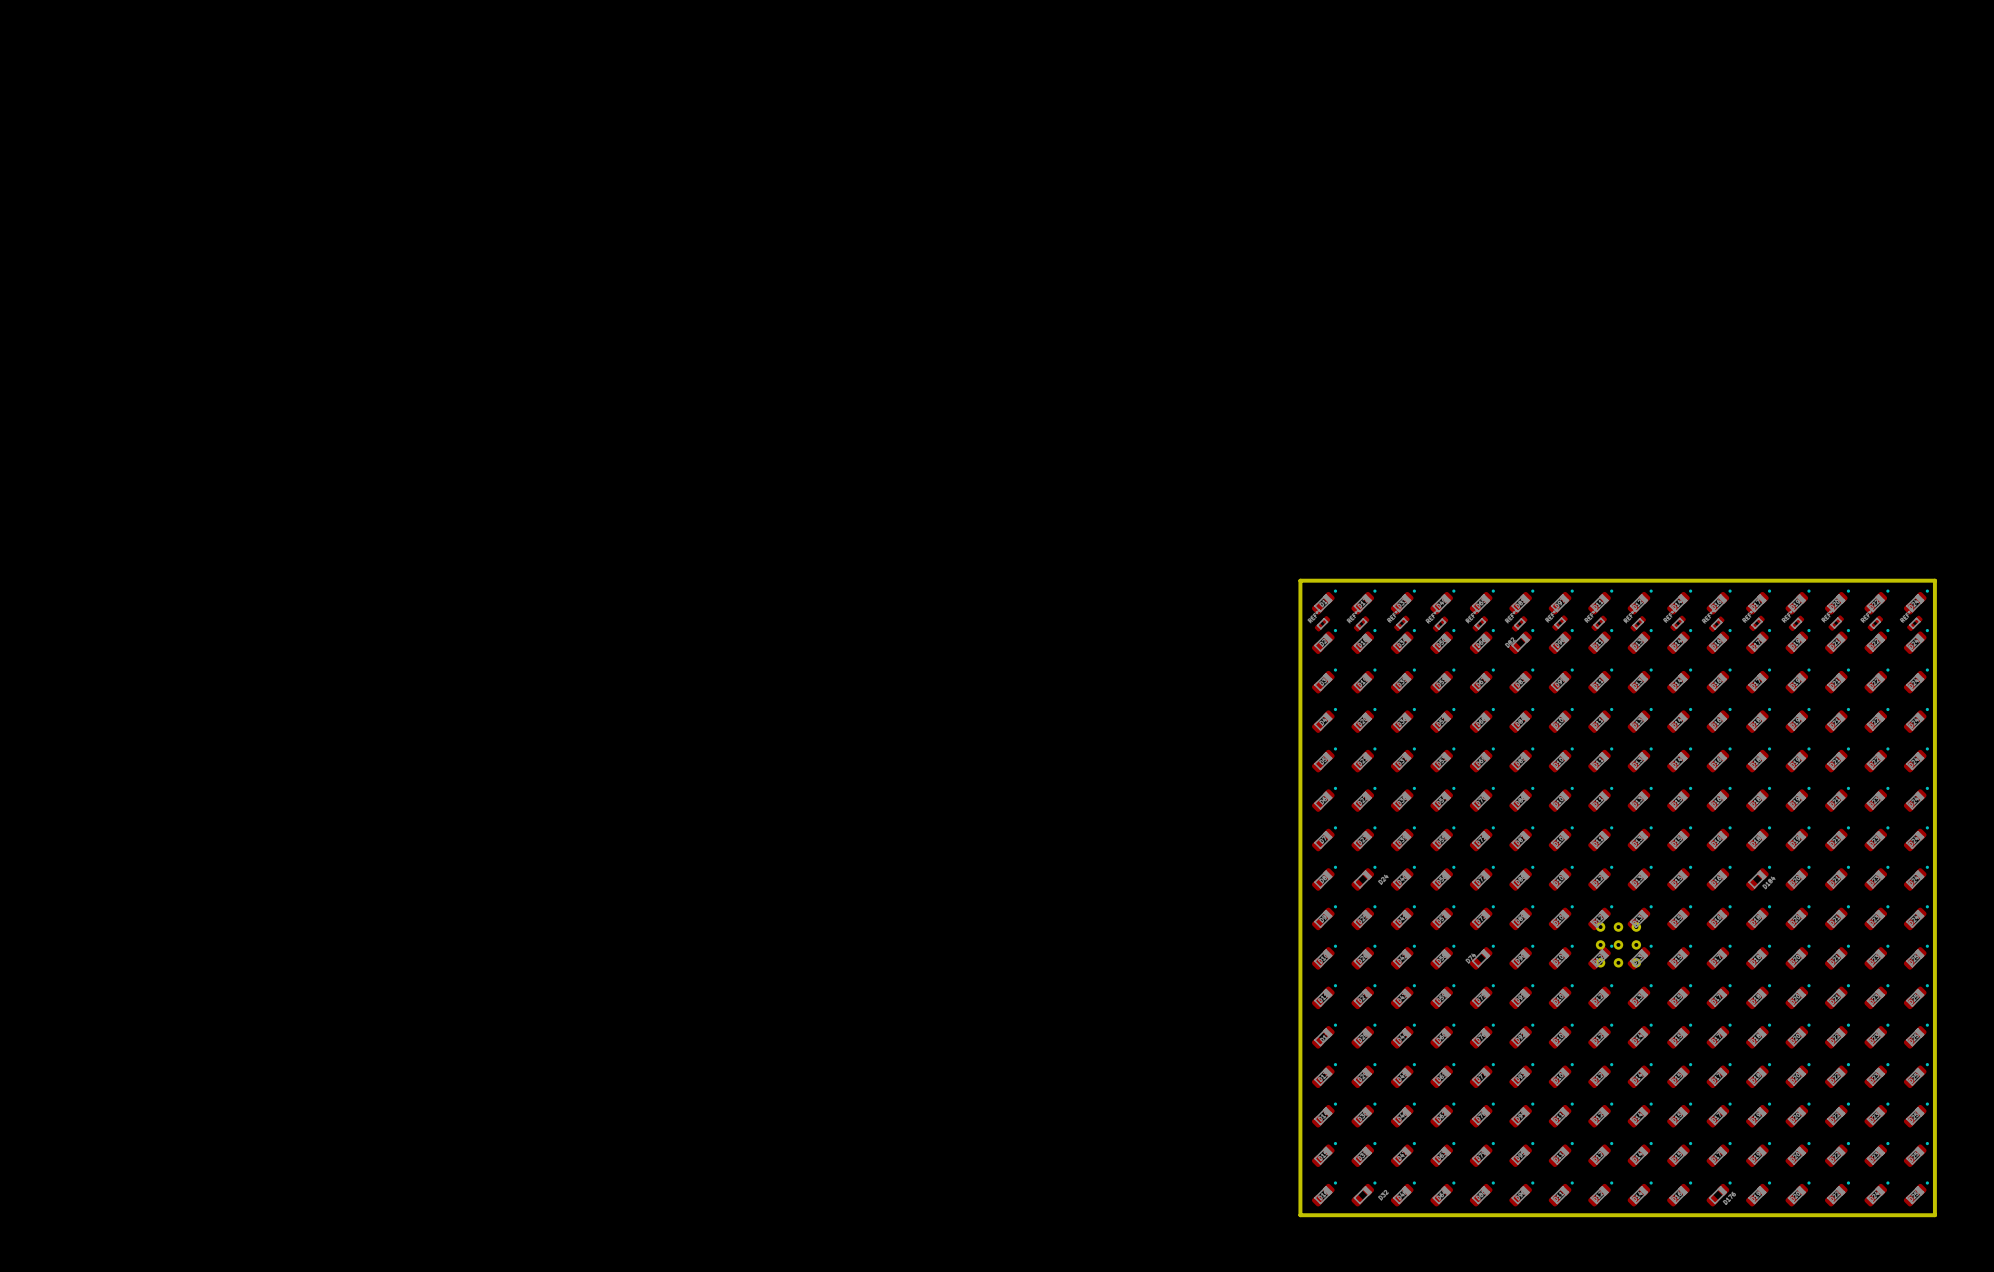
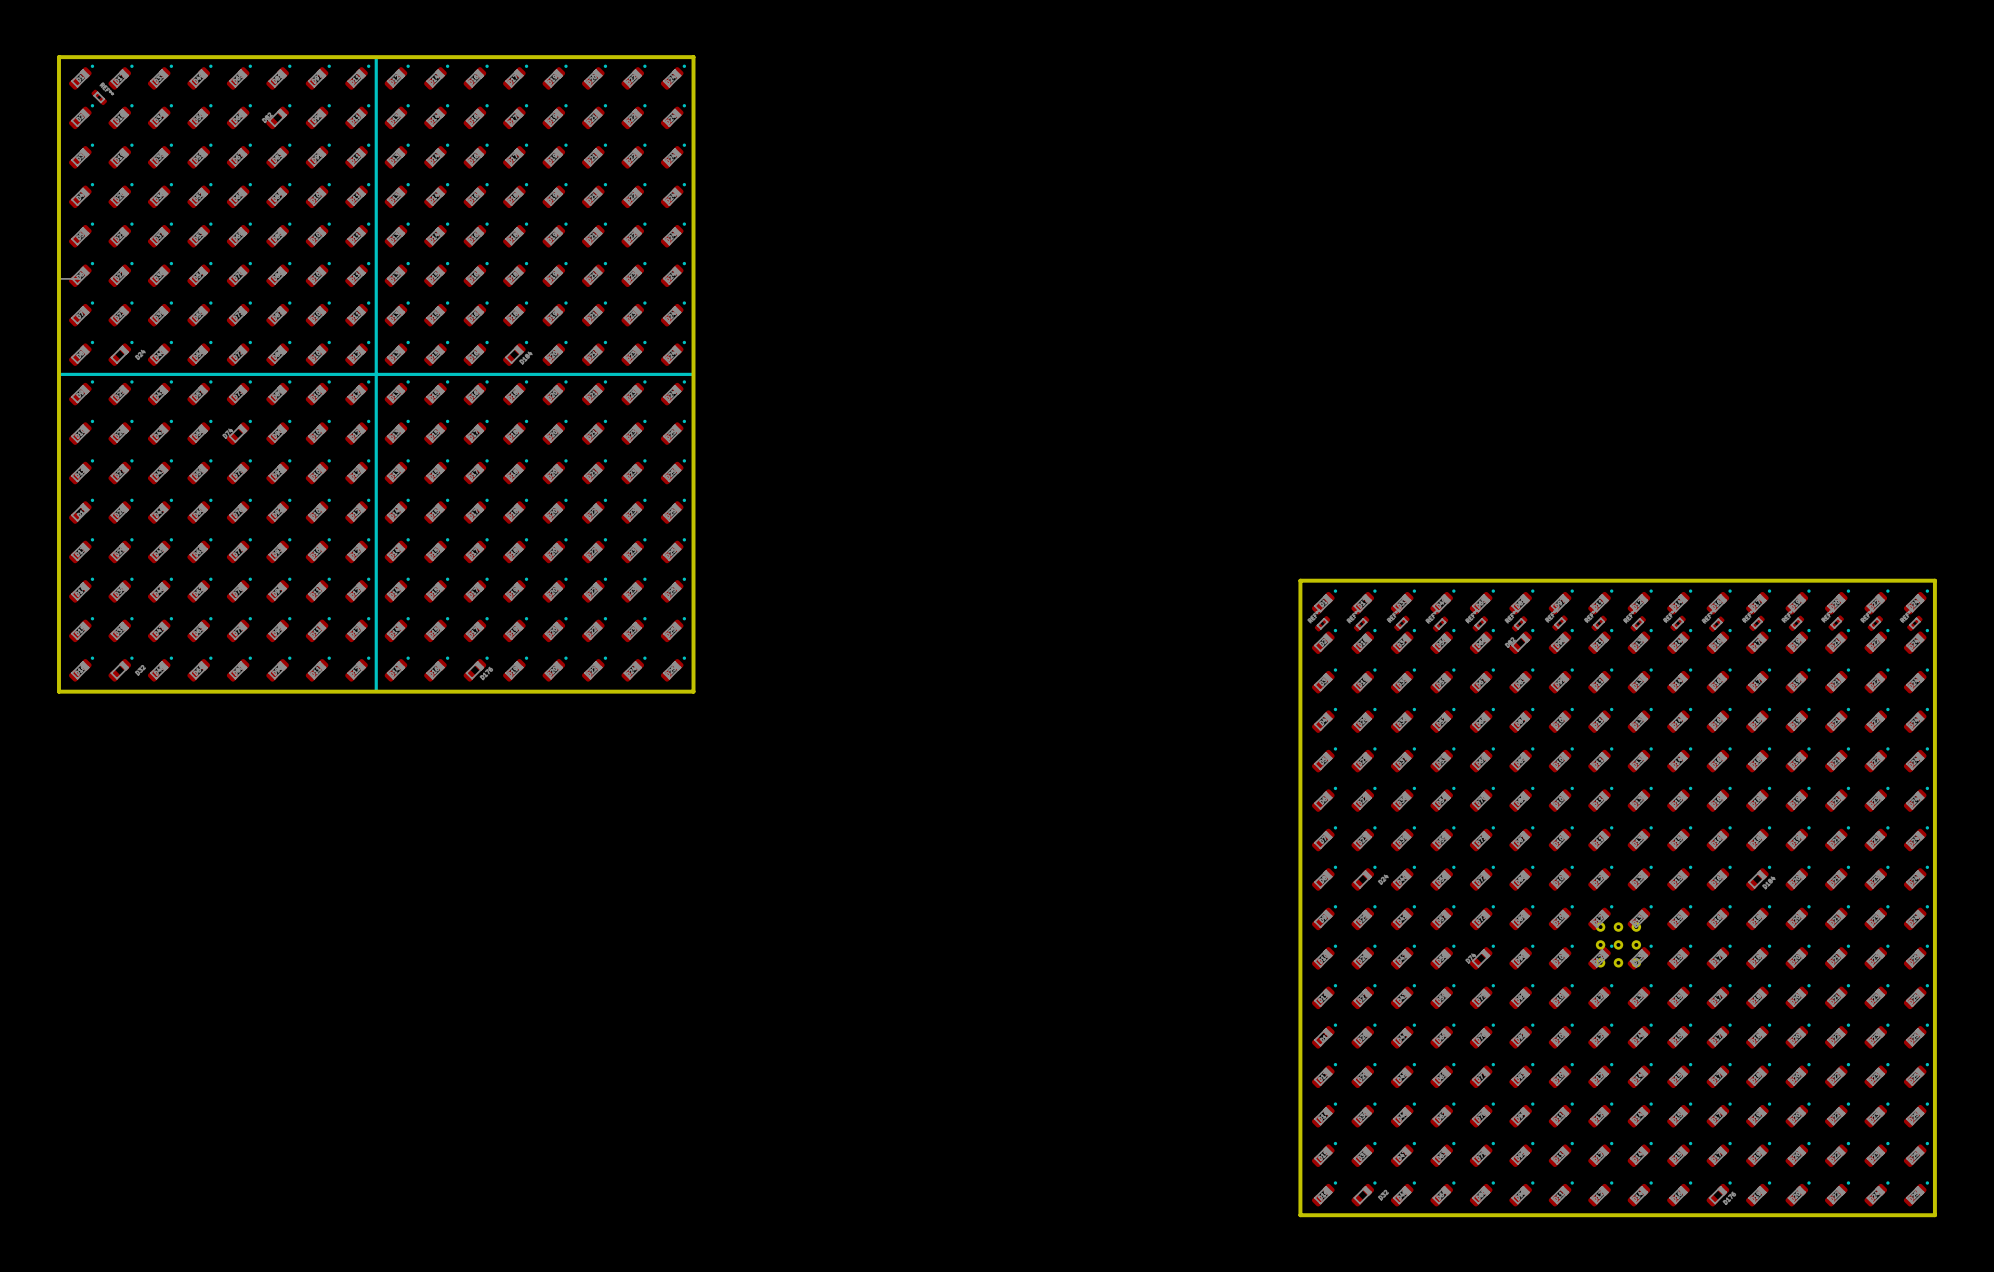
board edge: none -> (58, 57) (58, 691) (693, 691) (693, 57) (58, 57)
line: none -> (376, 58) (376, 690)
part: none -> (81, 77)
part: none -> (120, 77)
part: none -> (160, 77)
part: none -> (199, 77)
part: none -> (239, 77)
part: none -> (278, 77)
part: none -> (318, 77)
part: none -> (357, 77)
part: none -> (397, 77)
part: none -> (436, 77)
part: none -> (476, 77)
part: none -> (515, 77)
part: none -> (555, 77)
part: none -> (594, 77)
part: none -> (633, 77)
part: none -> (673, 77)
part: none -> (99, 97)
part: none -> (81, 116)
part: none -> (120, 116)
part: none -> (160, 116)
part: none -> (199, 116)
part: none -> (239, 116)
part: none -> (278, 116)
part: none -> (318, 116)
part: none -> (357, 116)
part: none -> (397, 116)
part: none -> (436, 116)
part: none -> (476, 116)
part: none -> (515, 116)
part: none -> (555, 116)
part: none -> (594, 116)
part: none -> (633, 116)
part: none -> (673, 116)
part: none -> (81, 156)
part: none -> (120, 156)
part: none -> (160, 156)
part: none -> (199, 156)
part: none -> (239, 156)
part: none -> (278, 156)
part: none -> (318, 156)
part: none -> (357, 156)
part: none -> (397, 156)
part: none -> (436, 156)
part: none -> (476, 156)
part: none -> (515, 156)
part: none -> (555, 156)
part: none -> (594, 156)
part: none -> (633, 156)
part: none -> (673, 156)
part: none -> (81, 195)
part: none -> (120, 195)
part: none -> (160, 195)
part: none -> (199, 195)
part: none -> (239, 195)
part: none -> (278, 195)
part: none -> (318, 195)
part: none -> (357, 195)
part: none -> (397, 195)
part: none -> (436, 195)
part: none -> (476, 195)
part: none -> (515, 195)
part: none -> (555, 195)
part: none -> (594, 195)
part: none -> (633, 195)
part: none -> (673, 195)
part: none -> (81, 235)
part: none -> (120, 235)
part: none -> (160, 235)
part: none -> (199, 235)
part: none -> (239, 235)
part: none -> (278, 235)
part: none -> (318, 235)
part: none -> (357, 235)
part: none -> (397, 235)
part: none -> (436, 235)
part: none -> (476, 235)
part: none -> (515, 235)
part: none -> (555, 235)
part: none -> (594, 235)
part: none -> (633, 235)
part: none -> (673, 235)
part: none -> (81, 274)
part: none -> (120, 274)
part: none -> (160, 274)
part: none -> (199, 274)
part: none -> (239, 274)
part: none -> (278, 274)
part: none -> (318, 274)
part: none -> (357, 274)
part: none -> (397, 274)
part: none -> (436, 274)
part: none -> (476, 274)
part: none -> (515, 274)
part: none -> (555, 274)
part: none -> (594, 274)
part: none -> (633, 274)
part: none -> (673, 274)
line: none -> (58, 278) (80, 278)
part: none -> (81, 313)
part: none -> (120, 313)
part: none -> (160, 313)
part: none -> (199, 313)
part: none -> (239, 313)
part: none -> (278, 313)
part: none -> (318, 313)
part: none -> (357, 313)
part: none -> (397, 313)
part: none -> (436, 313)
part: none -> (476, 313)
part: none -> (515, 313)
part: none -> (555, 313)
part: none -> (594, 313)
part: none -> (633, 313)
part: none -> (673, 313)
part: none -> (81, 353)
part: none -> (120, 353)
part: none -> (160, 353)
part: none -> (199, 353)
part: none -> (239, 353)
part: none -> (278, 353)
part: none -> (318, 353)
part: none -> (357, 353)
part: none -> (397, 353)
part: none -> (436, 353)
part: none -> (476, 353)
part: none -> (515, 353)
part: none -> (555, 353)
part: none -> (594, 353)
part: none -> (633, 353)
part: none -> (673, 353)
line: none -> (60, 374) (691, 374)
part: none -> (81, 392)
part: none -> (120, 392)
part: none -> (160, 392)
part: none -> (199, 392)
part: none -> (239, 392)
part: none -> (278, 392)
part: none -> (318, 392)
part: none -> (357, 392)
part: none -> (397, 392)
part: none -> (436, 392)
part: none -> (476, 392)
part: none -> (515, 392)
part: none -> (555, 392)
part: none -> (594, 392)
part: none -> (633, 392)
part: none -> (673, 392)
part: none -> (81, 432)
part: none -> (120, 432)
part: none -> (160, 432)
part: none -> (199, 432)
part: none -> (239, 432)
part: none -> (278, 432)
part: none -> (318, 432)
part: none -> (357, 432)
part: none -> (397, 432)
part: none -> (436, 432)
part: none -> (476, 432)
part: none -> (515, 432)
part: none -> (555, 432)
part: none -> (594, 432)
part: none -> (633, 432)
part: none -> (673, 432)
part: none -> (81, 471)
part: none -> (120, 471)
part: none -> (160, 471)
part: none -> (199, 471)
part: none -> (239, 471)
part: none -> (278, 471)
part: none -> (318, 471)
part: none -> (357, 471)
part: none -> (397, 471)
part: none -> (436, 471)
part: none -> (476, 471)
part: none -> (515, 471)
part: none -> (555, 471)
part: none -> (594, 471)
part: none -> (633, 471)
part: none -> (673, 471)
part: none -> (81, 511)
part: none -> (120, 511)
part: none -> (160, 511)
part: none -> (199, 511)
part: none -> (239, 511)
part: none -> (278, 511)
part: none -> (318, 511)
part: none -> (357, 511)
part: none -> (397, 511)
part: none -> (436, 511)
part: none -> (476, 511)
part: none -> (515, 511)
part: none -> (555, 511)
part: none -> (594, 511)
part: none -> (633, 511)
part: none -> (673, 511)
part: none -> (81, 550)
part: none -> (120, 550)
part: none -> (160, 550)
part: none -> (199, 550)
part: none -> (239, 550)
part: none -> (278, 550)
part: none -> (318, 550)
part: none -> (357, 550)
part: none -> (397, 550)
part: none -> (436, 550)
part: none -> (476, 550)
part: none -> (515, 550)
part: none -> (555, 550)
part: none -> (594, 550)
part: none -> (633, 550)
part: none -> (673, 550)
part: none -> (81, 590)
part: none -> (120, 590)
part: none -> (160, 590)
part: none -> (199, 590)
part: none -> (239, 590)
part: none -> (278, 590)
part: none -> (318, 590)
part: none -> (357, 590)
part: none -> (397, 590)
part: none -> (436, 590)
part: none -> (476, 590)
part: none -> (515, 590)
part: none -> (555, 590)
part: none -> (594, 590)
part: none -> (633, 590)
part: none -> (673, 590)
part: none -> (81, 629)
part: none -> (120, 629)
part: none -> (160, 629)
part: none -> (199, 629)
part: none -> (239, 629)
part: none -> (278, 629)
part: none -> (318, 629)
part: none -> (357, 629)
part: none -> (397, 629)
part: none -> (436, 629)
part: none -> (476, 629)
part: none -> (515, 629)
part: none -> (555, 629)
part: none -> (594, 629)
part: none -> (633, 629)
part: none -> (673, 629)
part: none -> (81, 669)
part: none -> (120, 669)
part: none -> (160, 669)
part: none -> (199, 669)
part: none -> (239, 669)
part: none -> (278, 669)
part: none -> (318, 669)
part: none -> (357, 669)
part: none -> (397, 669)
part: none -> (436, 669)
part: none -> (476, 669)
part: none -> (515, 669)
part: none -> (555, 669)
part: none -> (594, 669)
part: none -> (633, 669)
part: none -> (673, 669)

